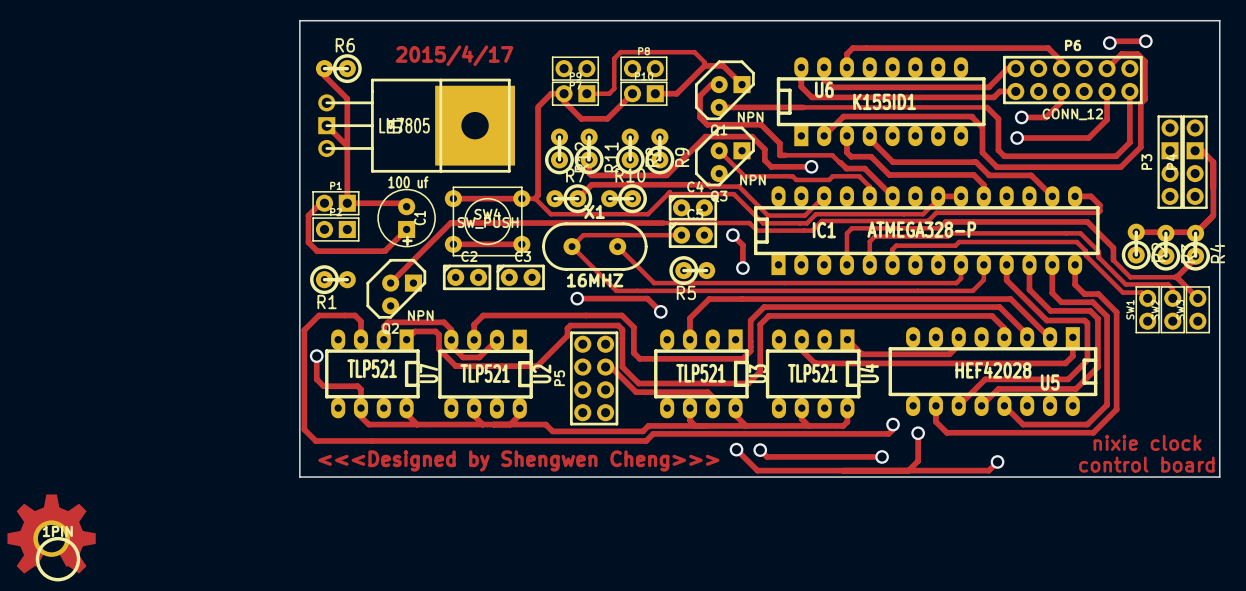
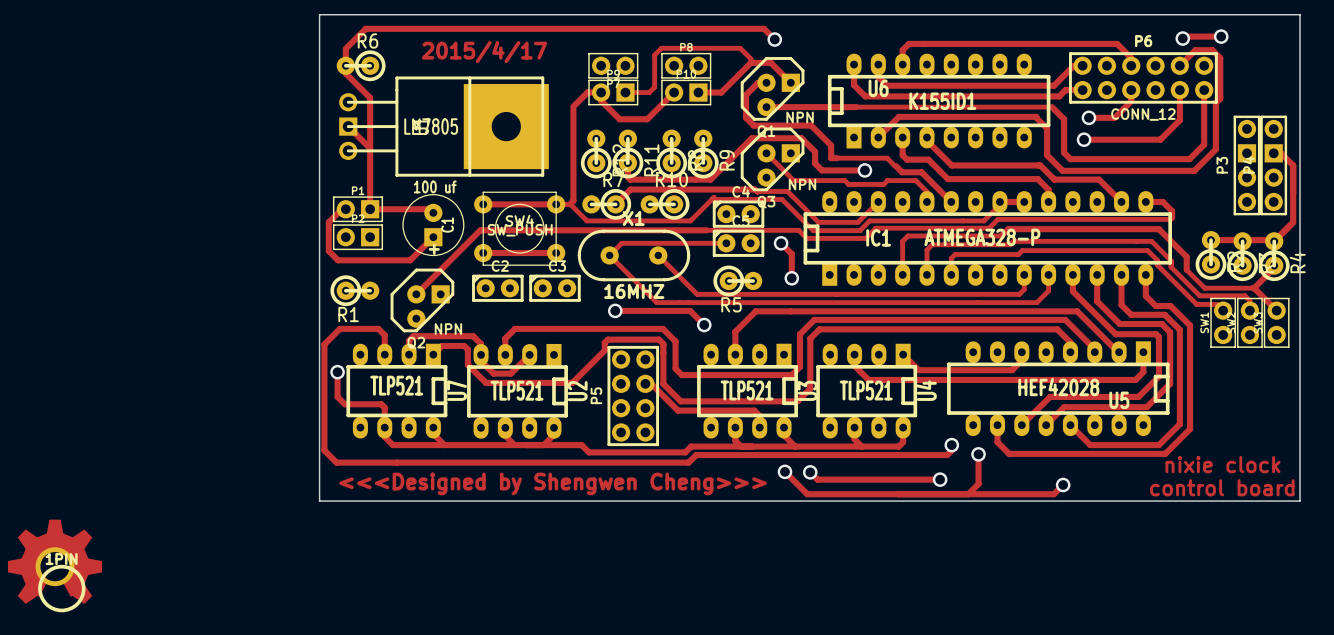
track: none -> (774, 39) (764, 28) (365, 28) (345, 48) (345, 65)
via: none -> (774, 39)

